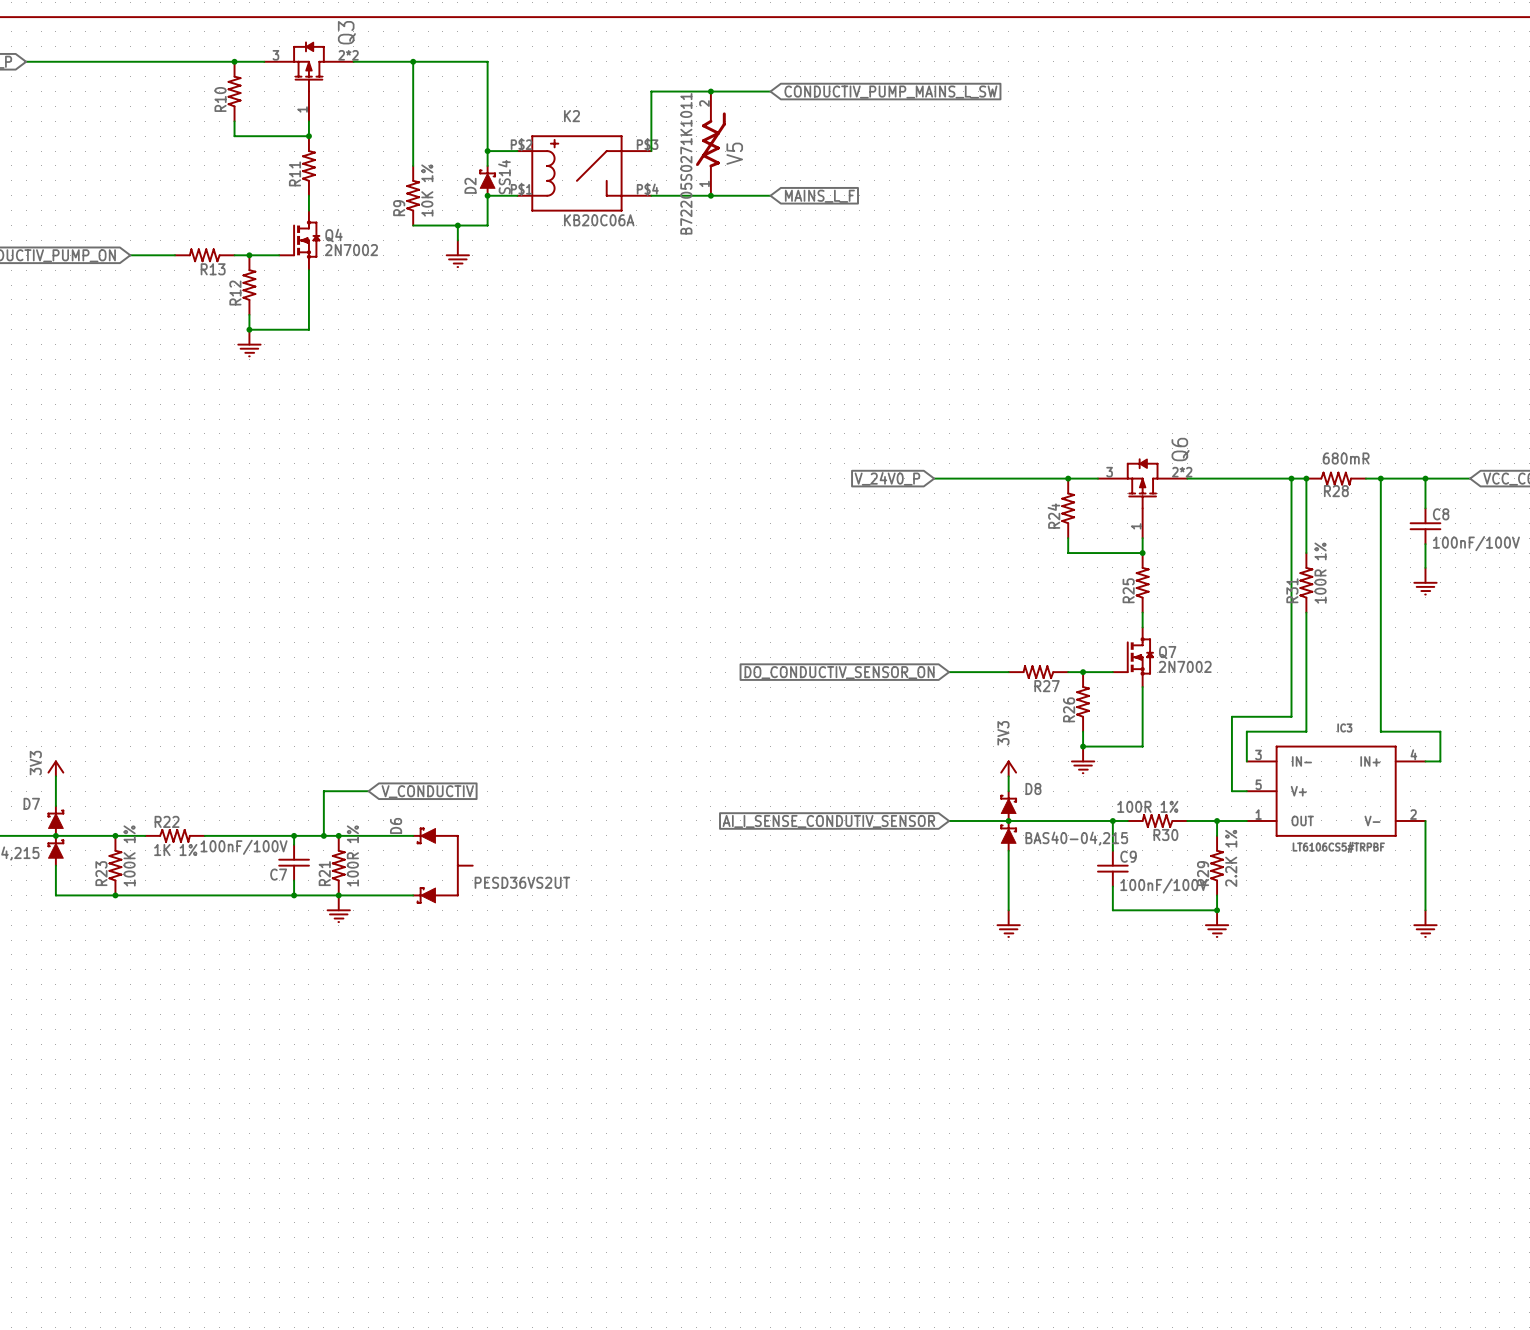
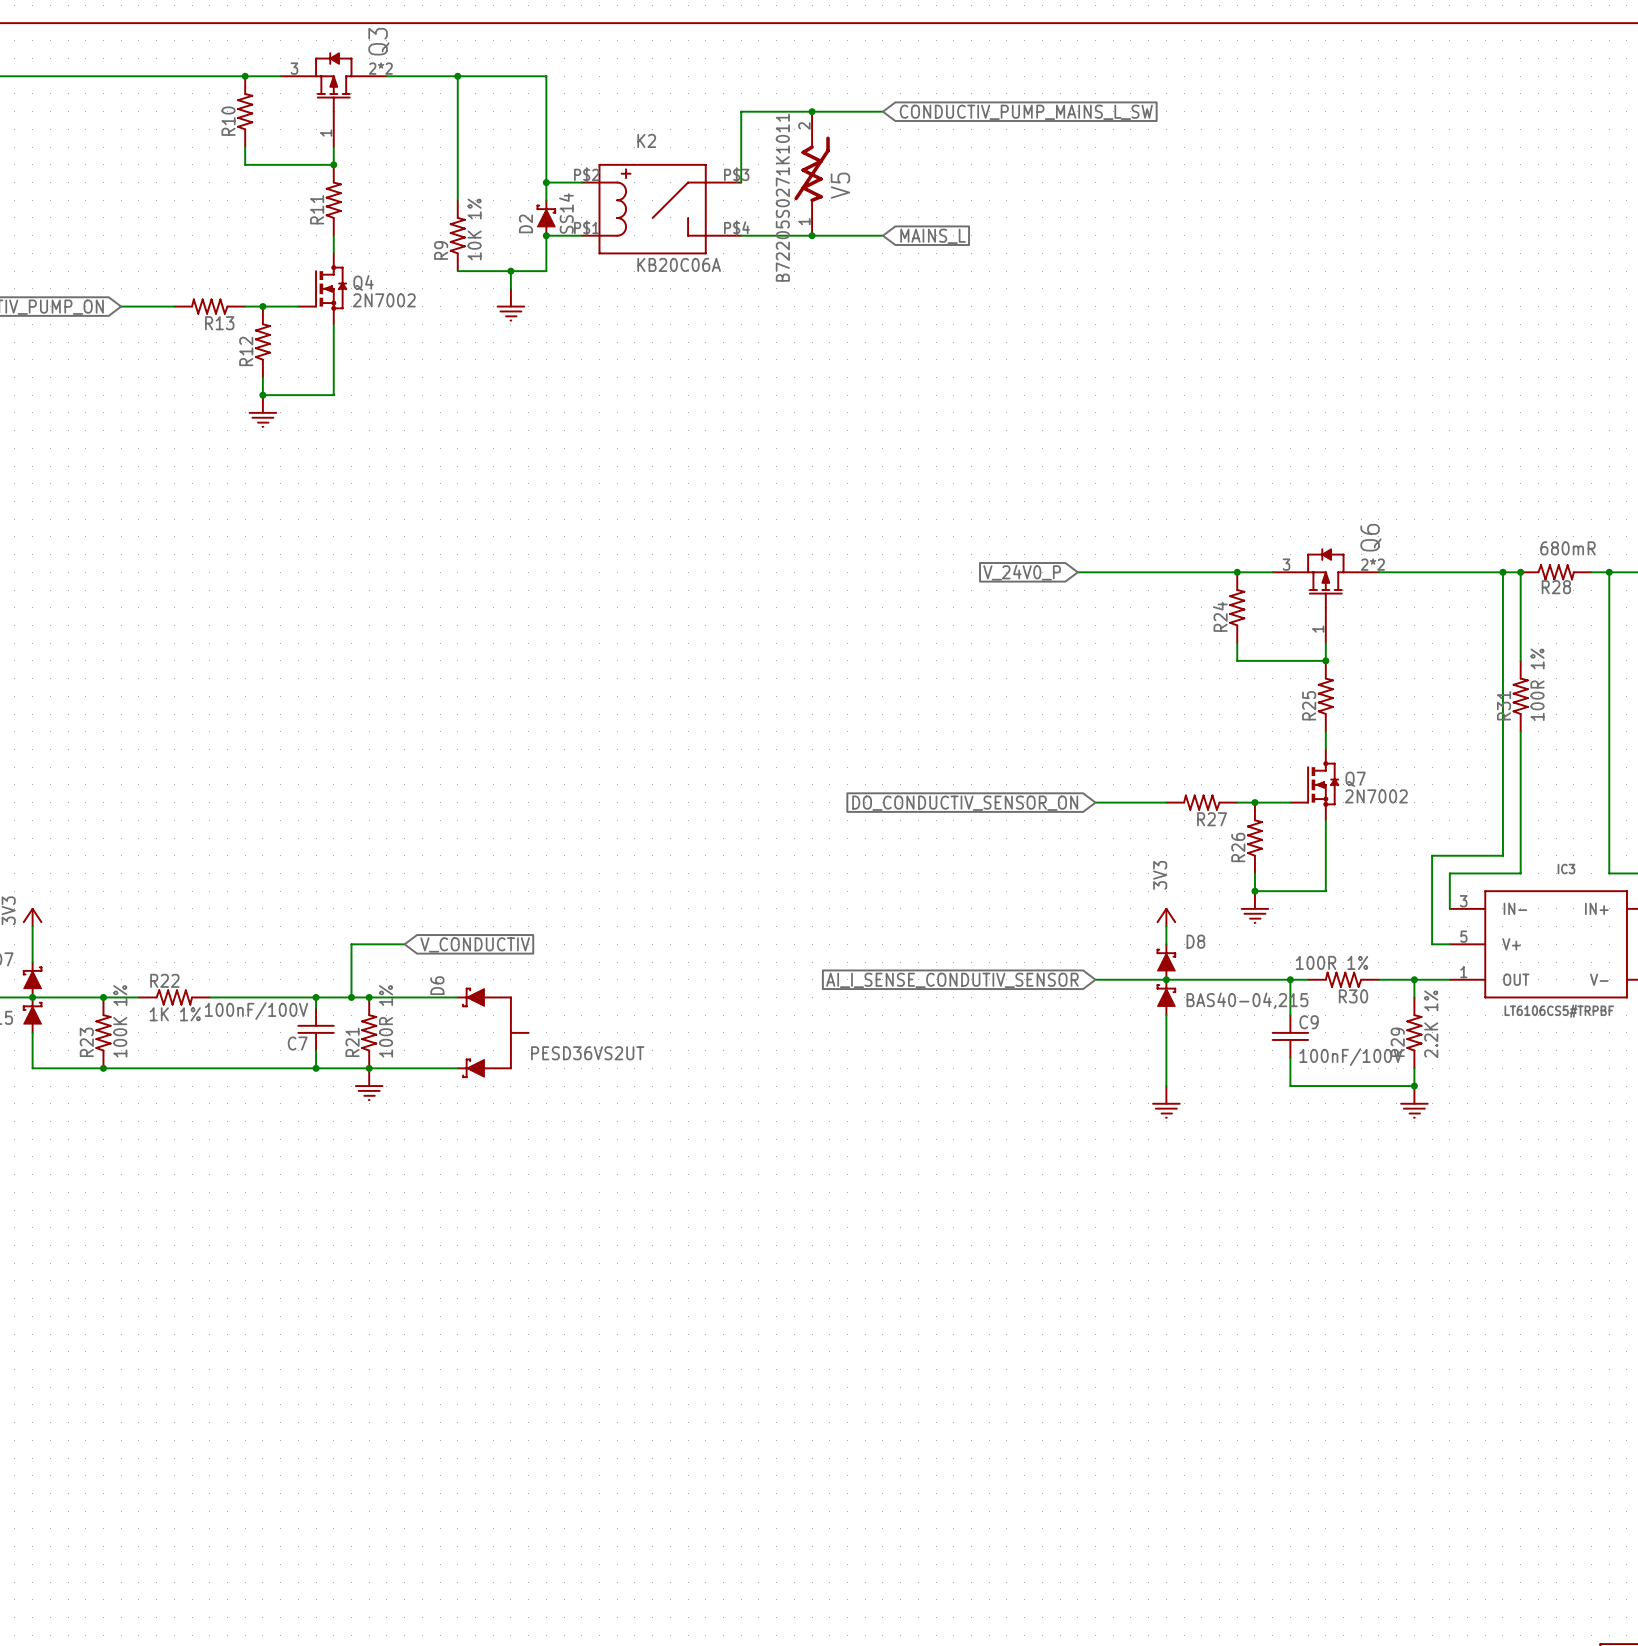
global label: MAINS_L_F (819, 196) -> MAINS_L (933, 236)

